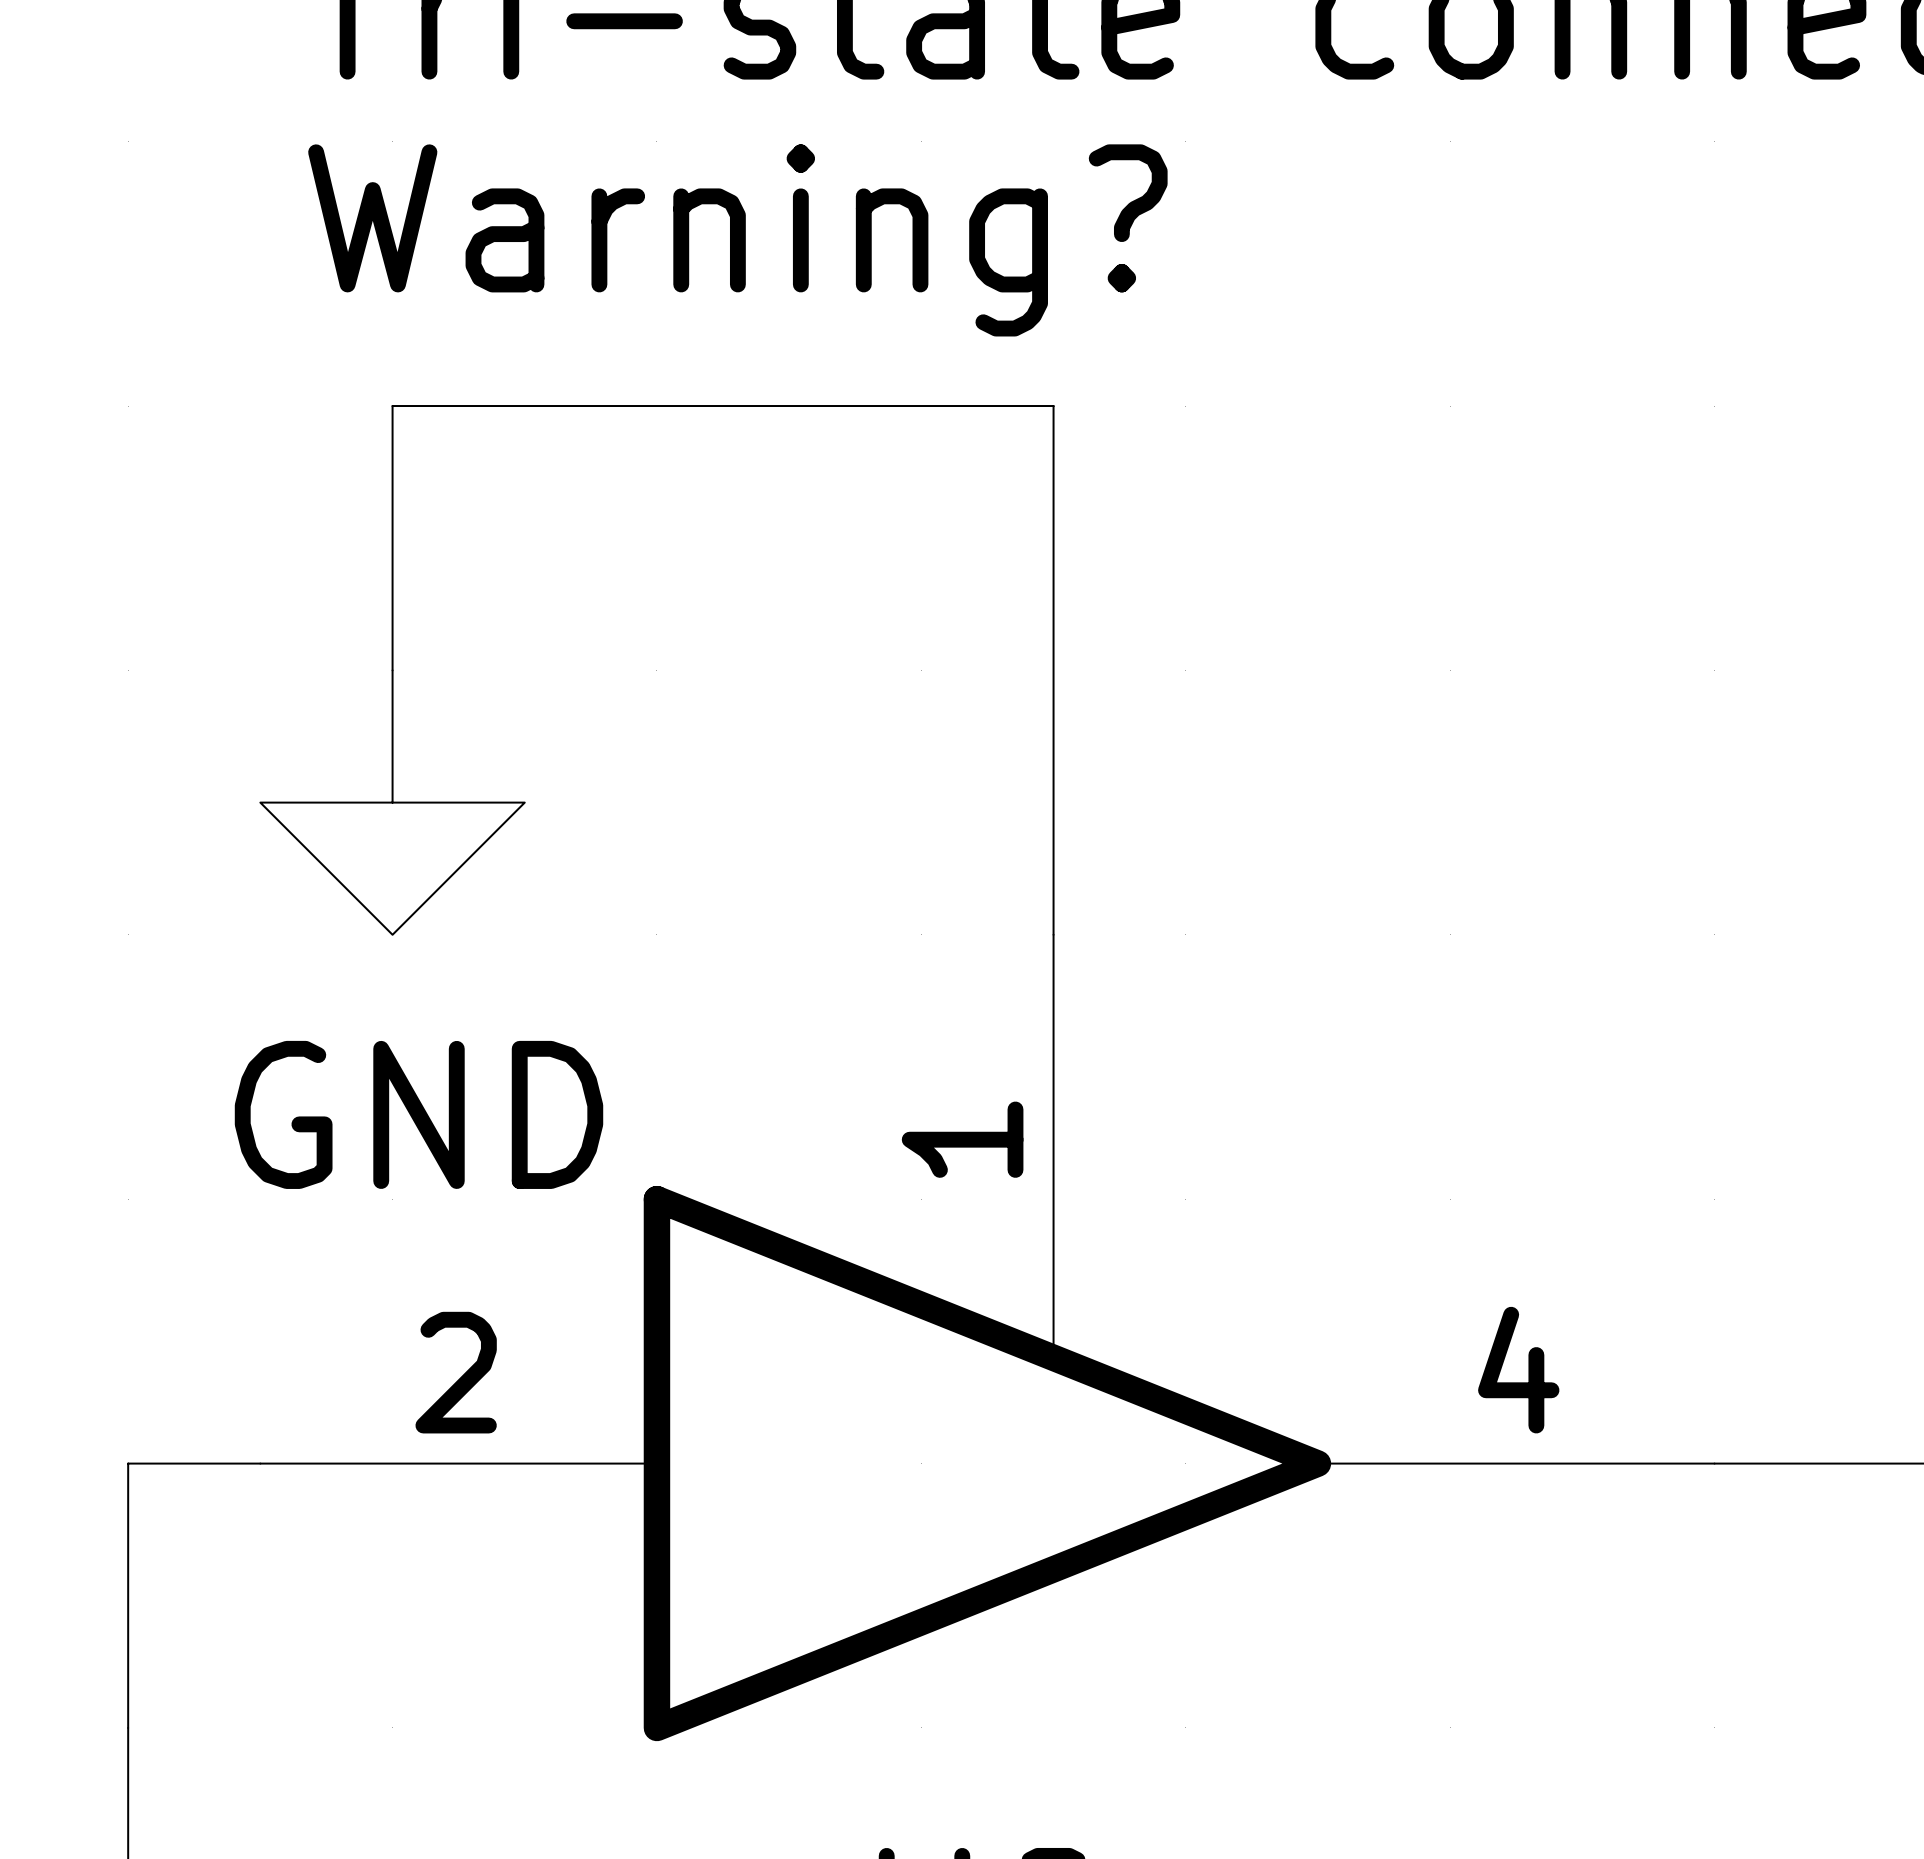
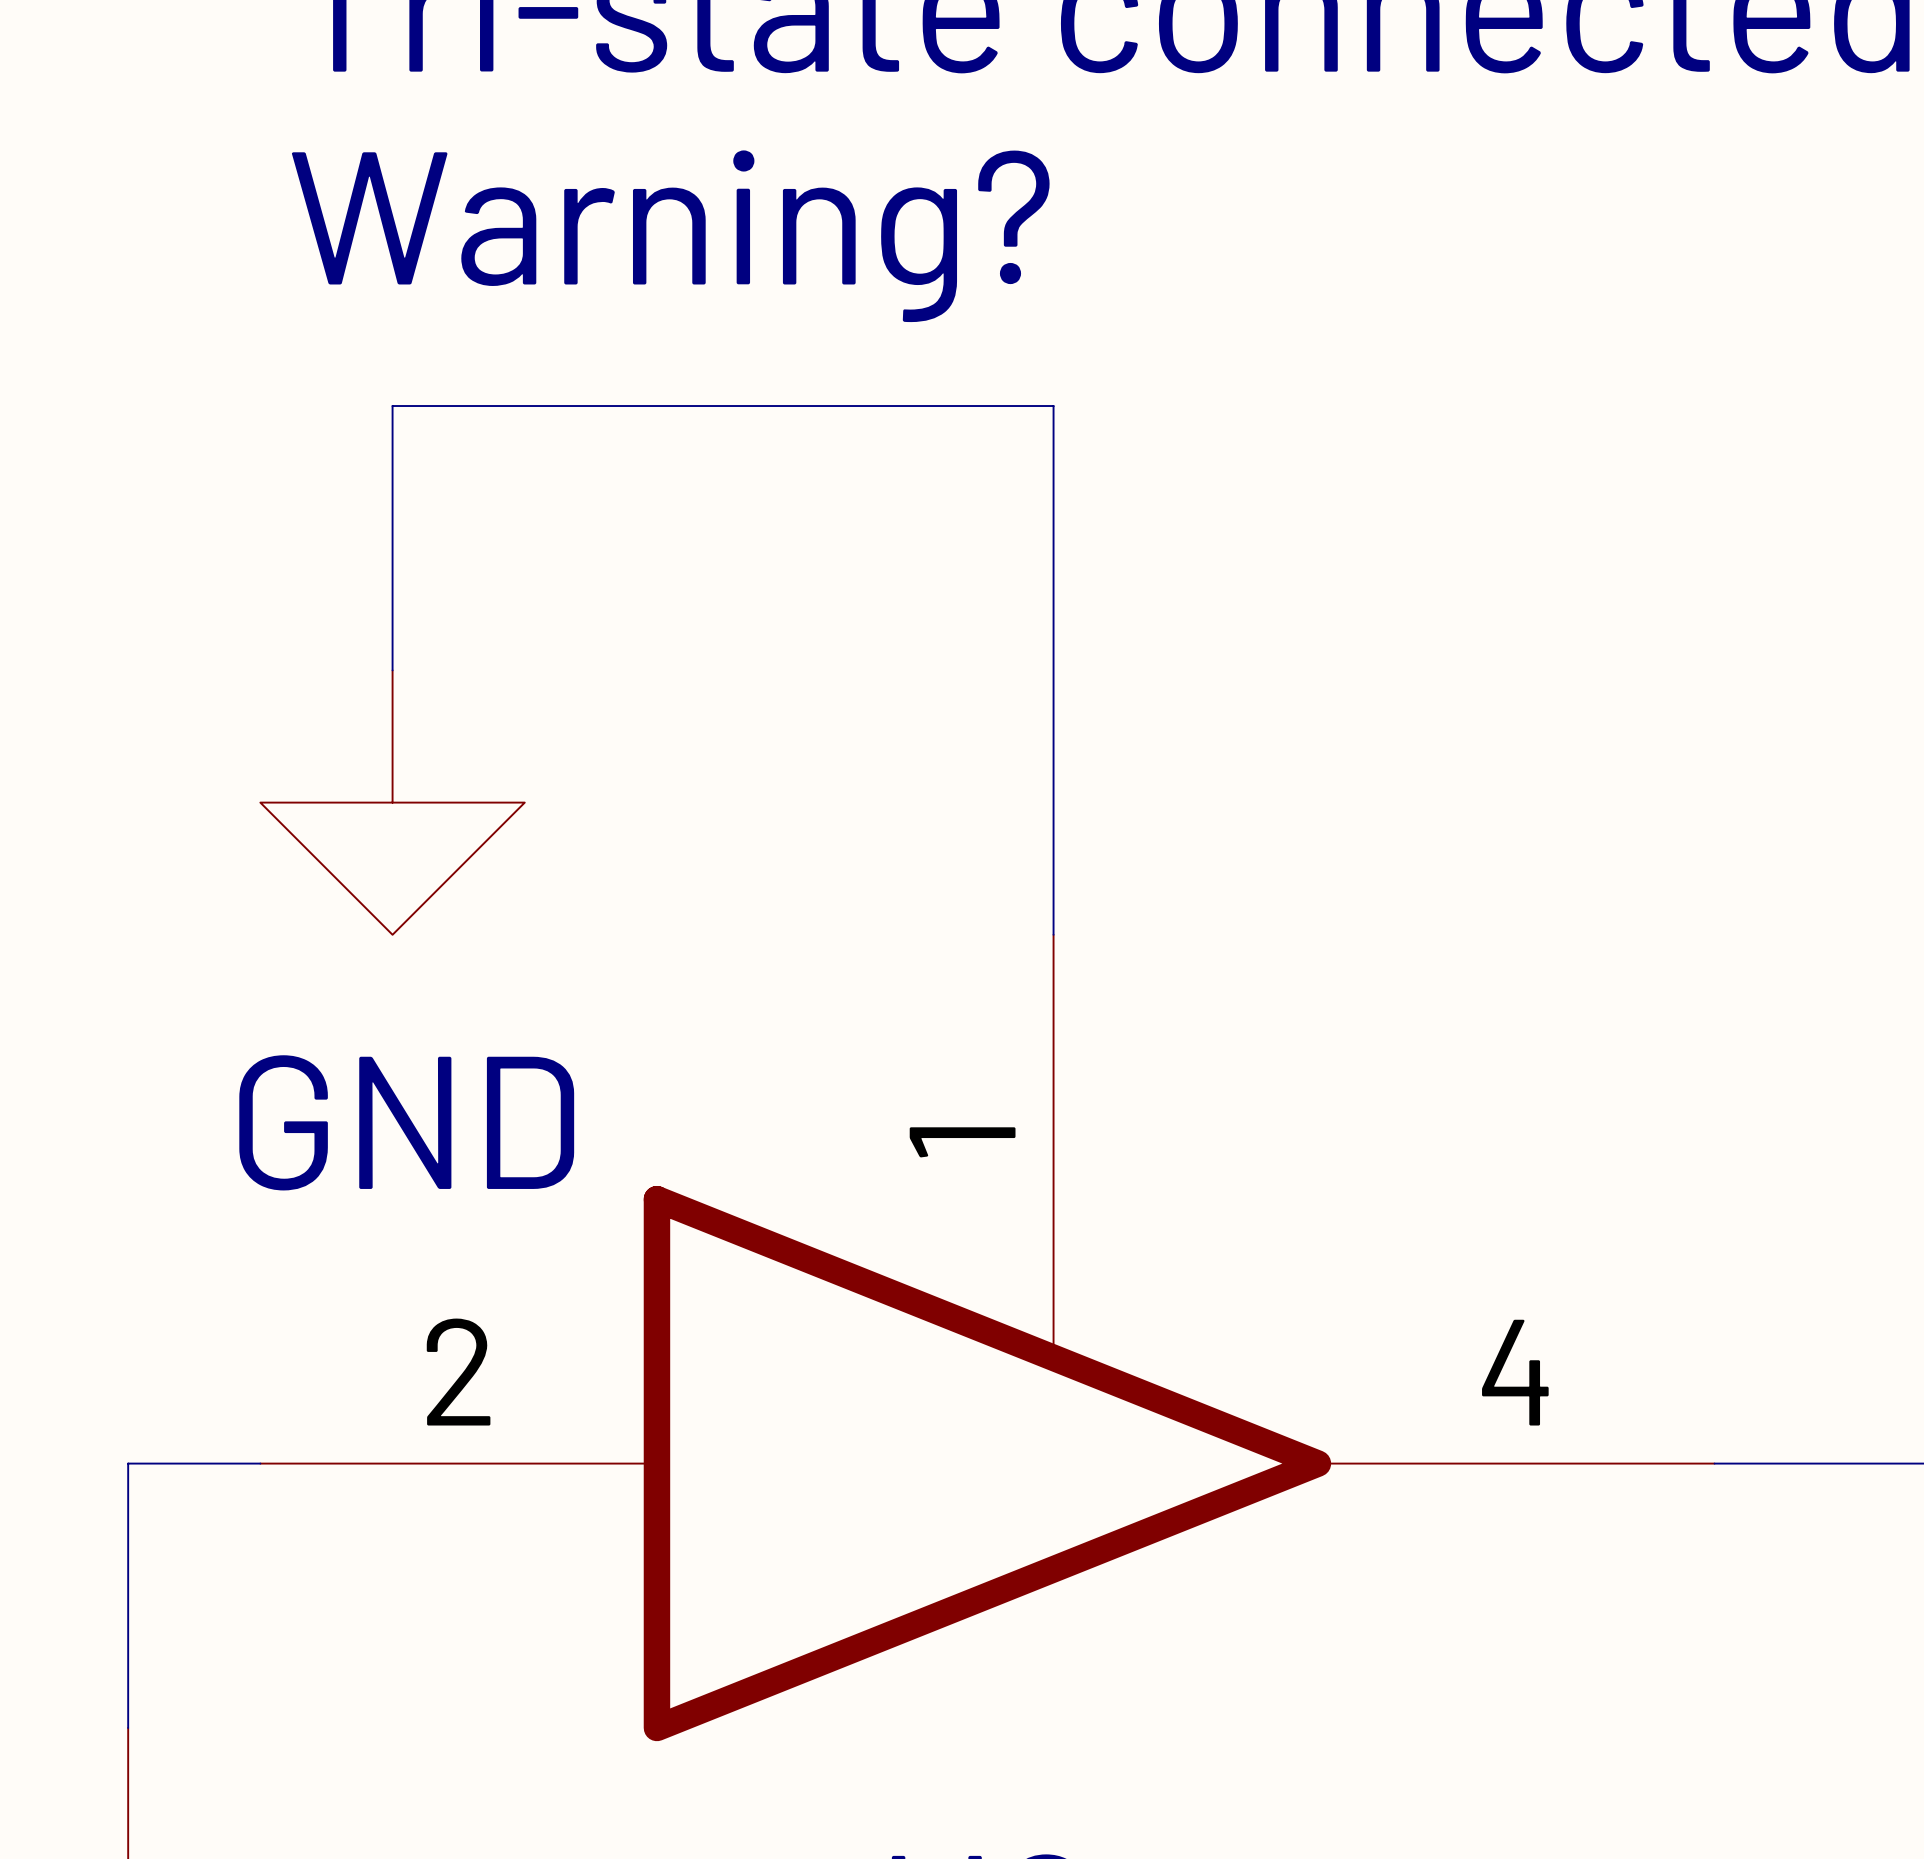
power symbol text position: GND (419, 1114) -> GND (406, 1122)

